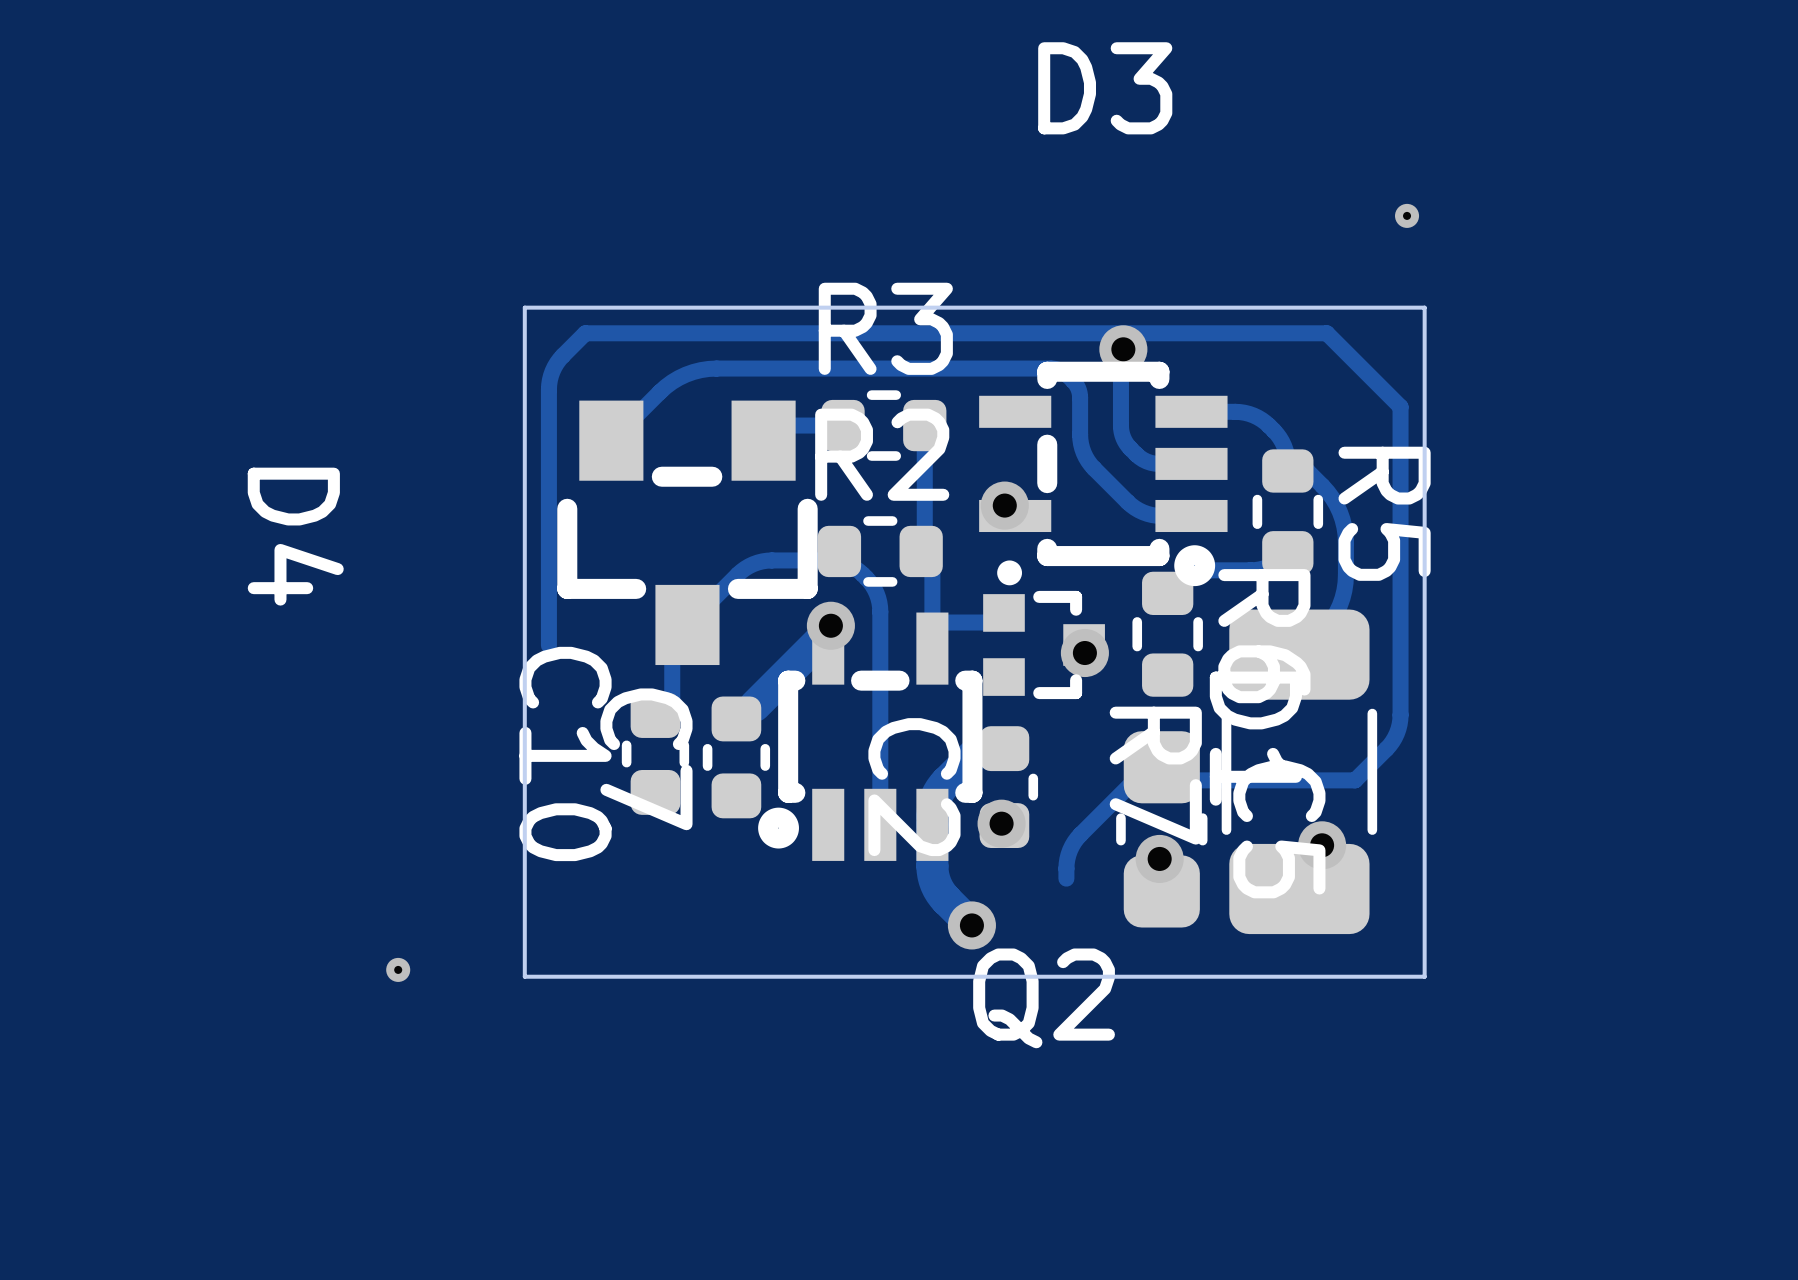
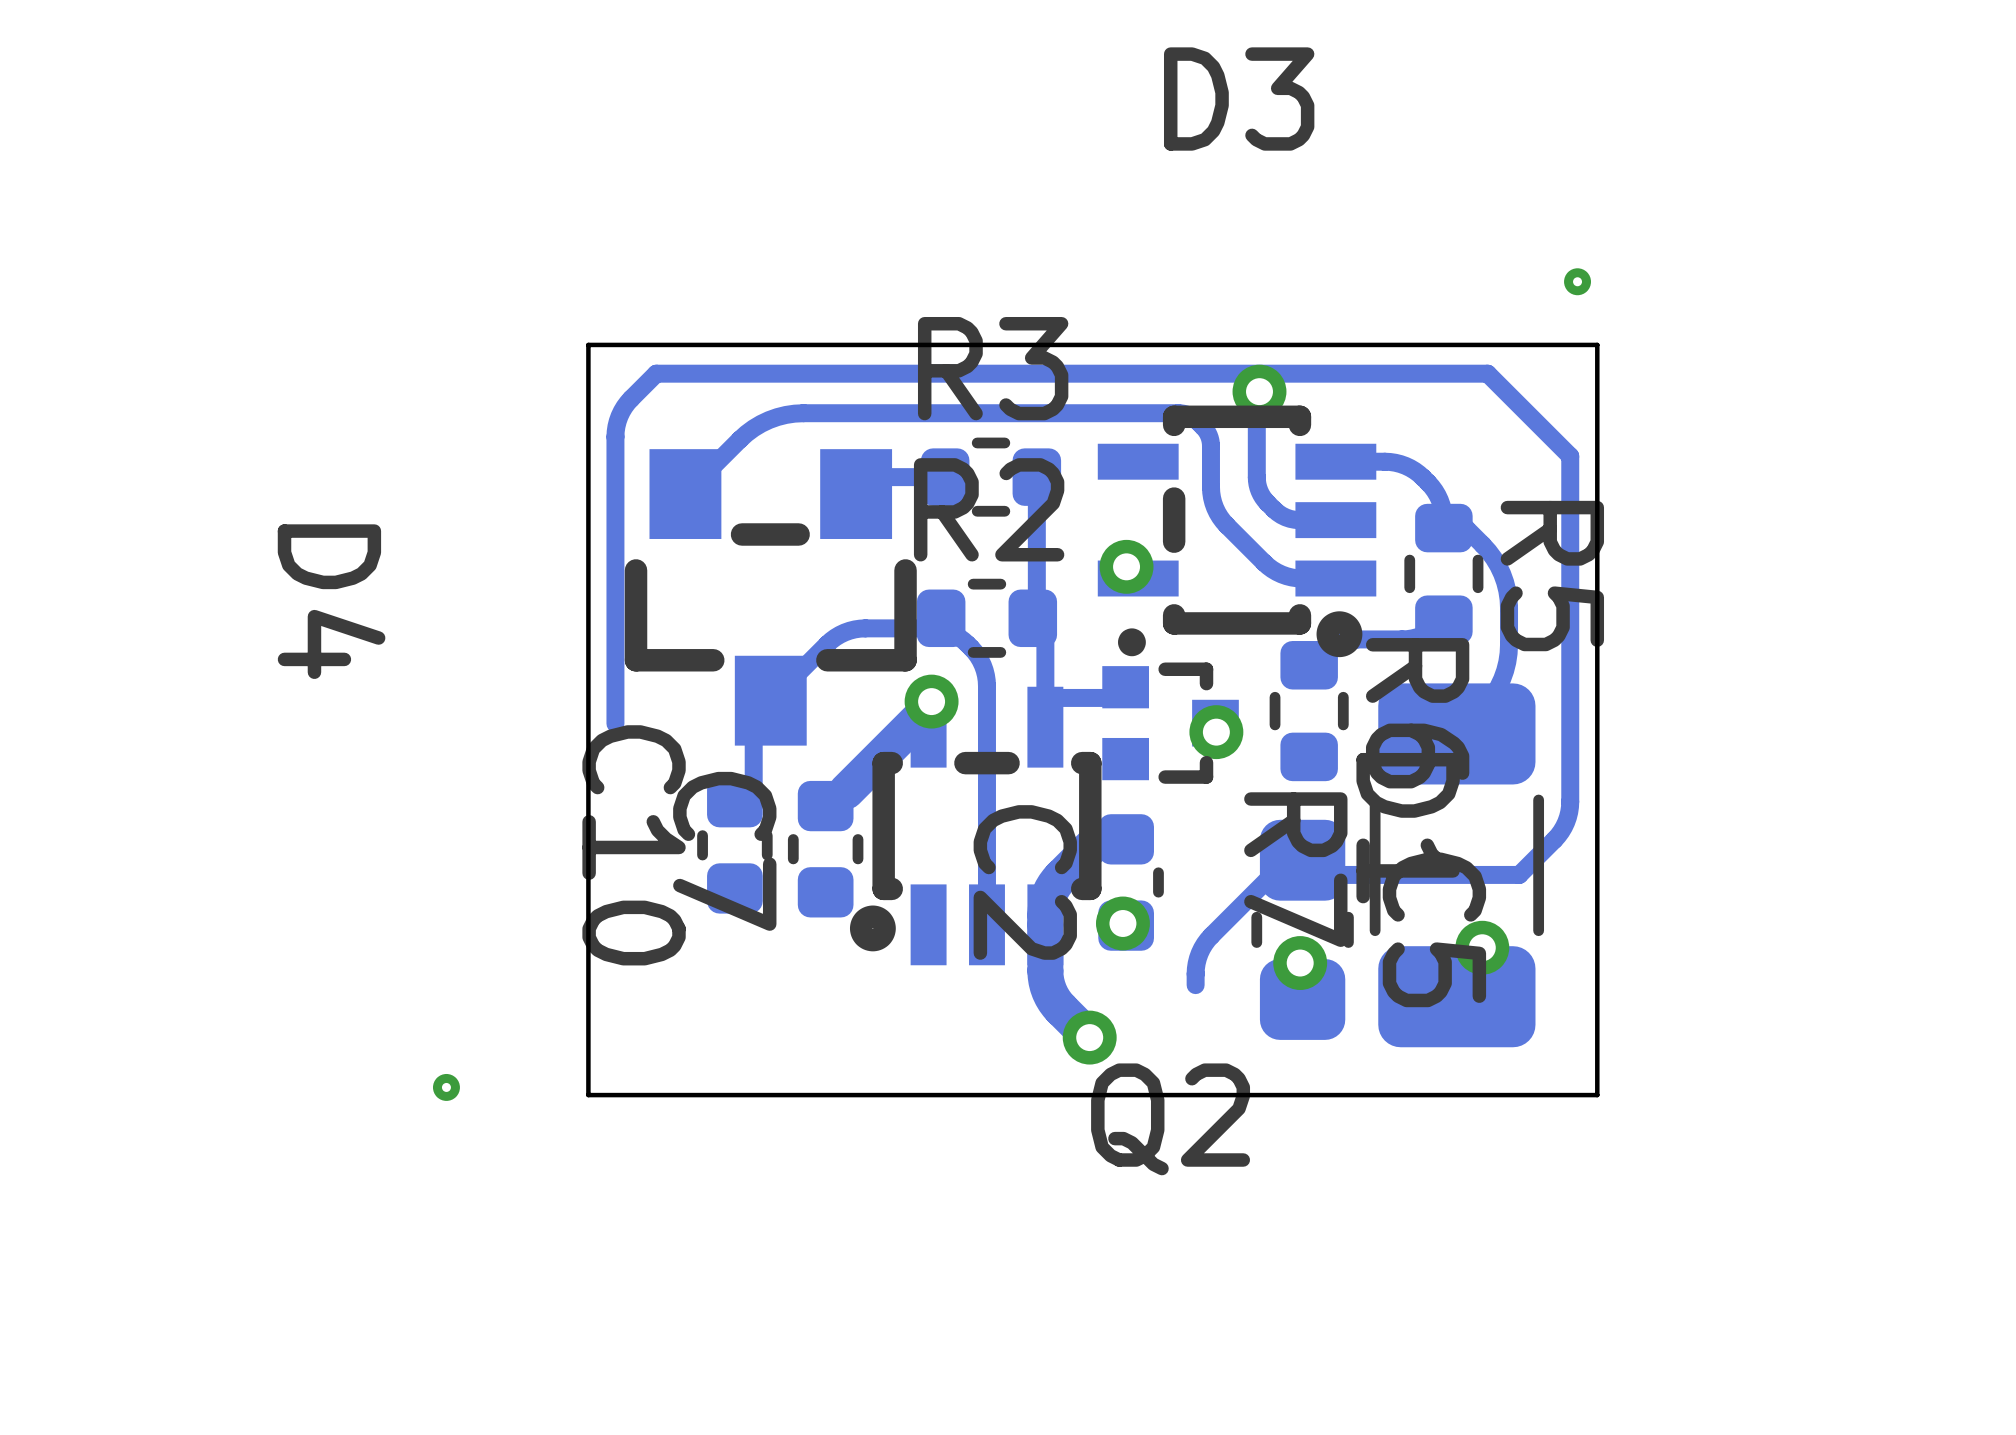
via position: (1407, 215) -> (1577, 281)

